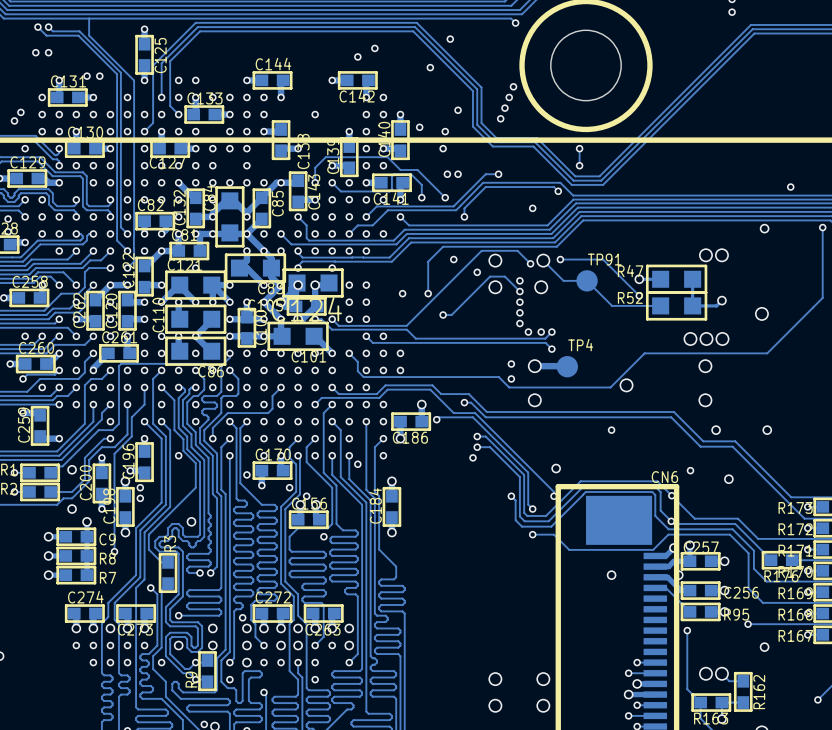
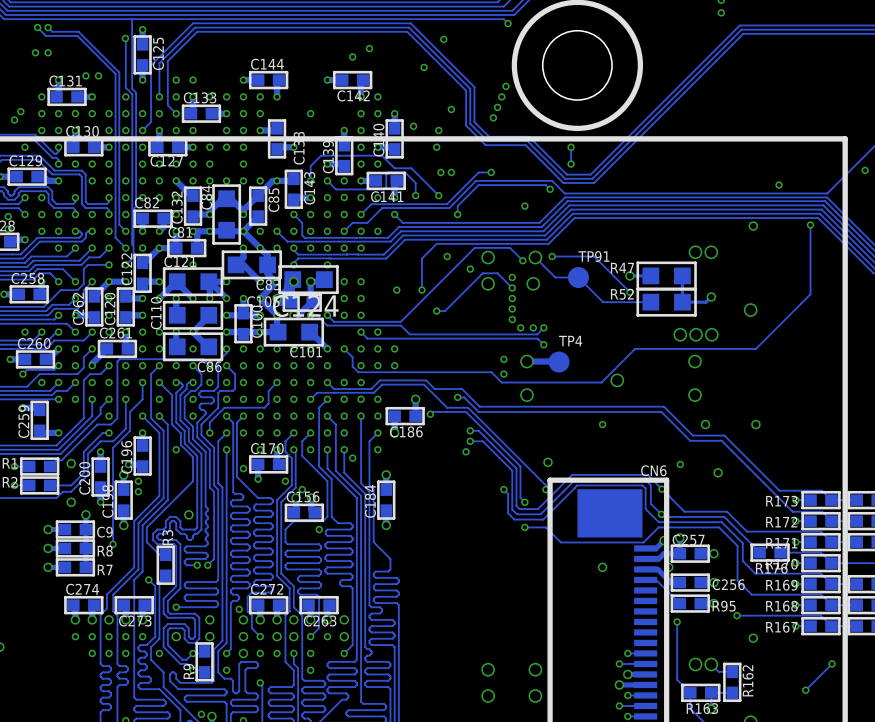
track: (89, 18) (89, 35) (134, 80) (134, 94) -> (125, 38) (125, 87) (132, 94)
via: none -> (125, 38)
via: none -> (125, 147)
track: (134, 248) (134, 261) -> (132, 19) (132, 88) (136, 92) (136, 206) (133, 208) (132, 258)

